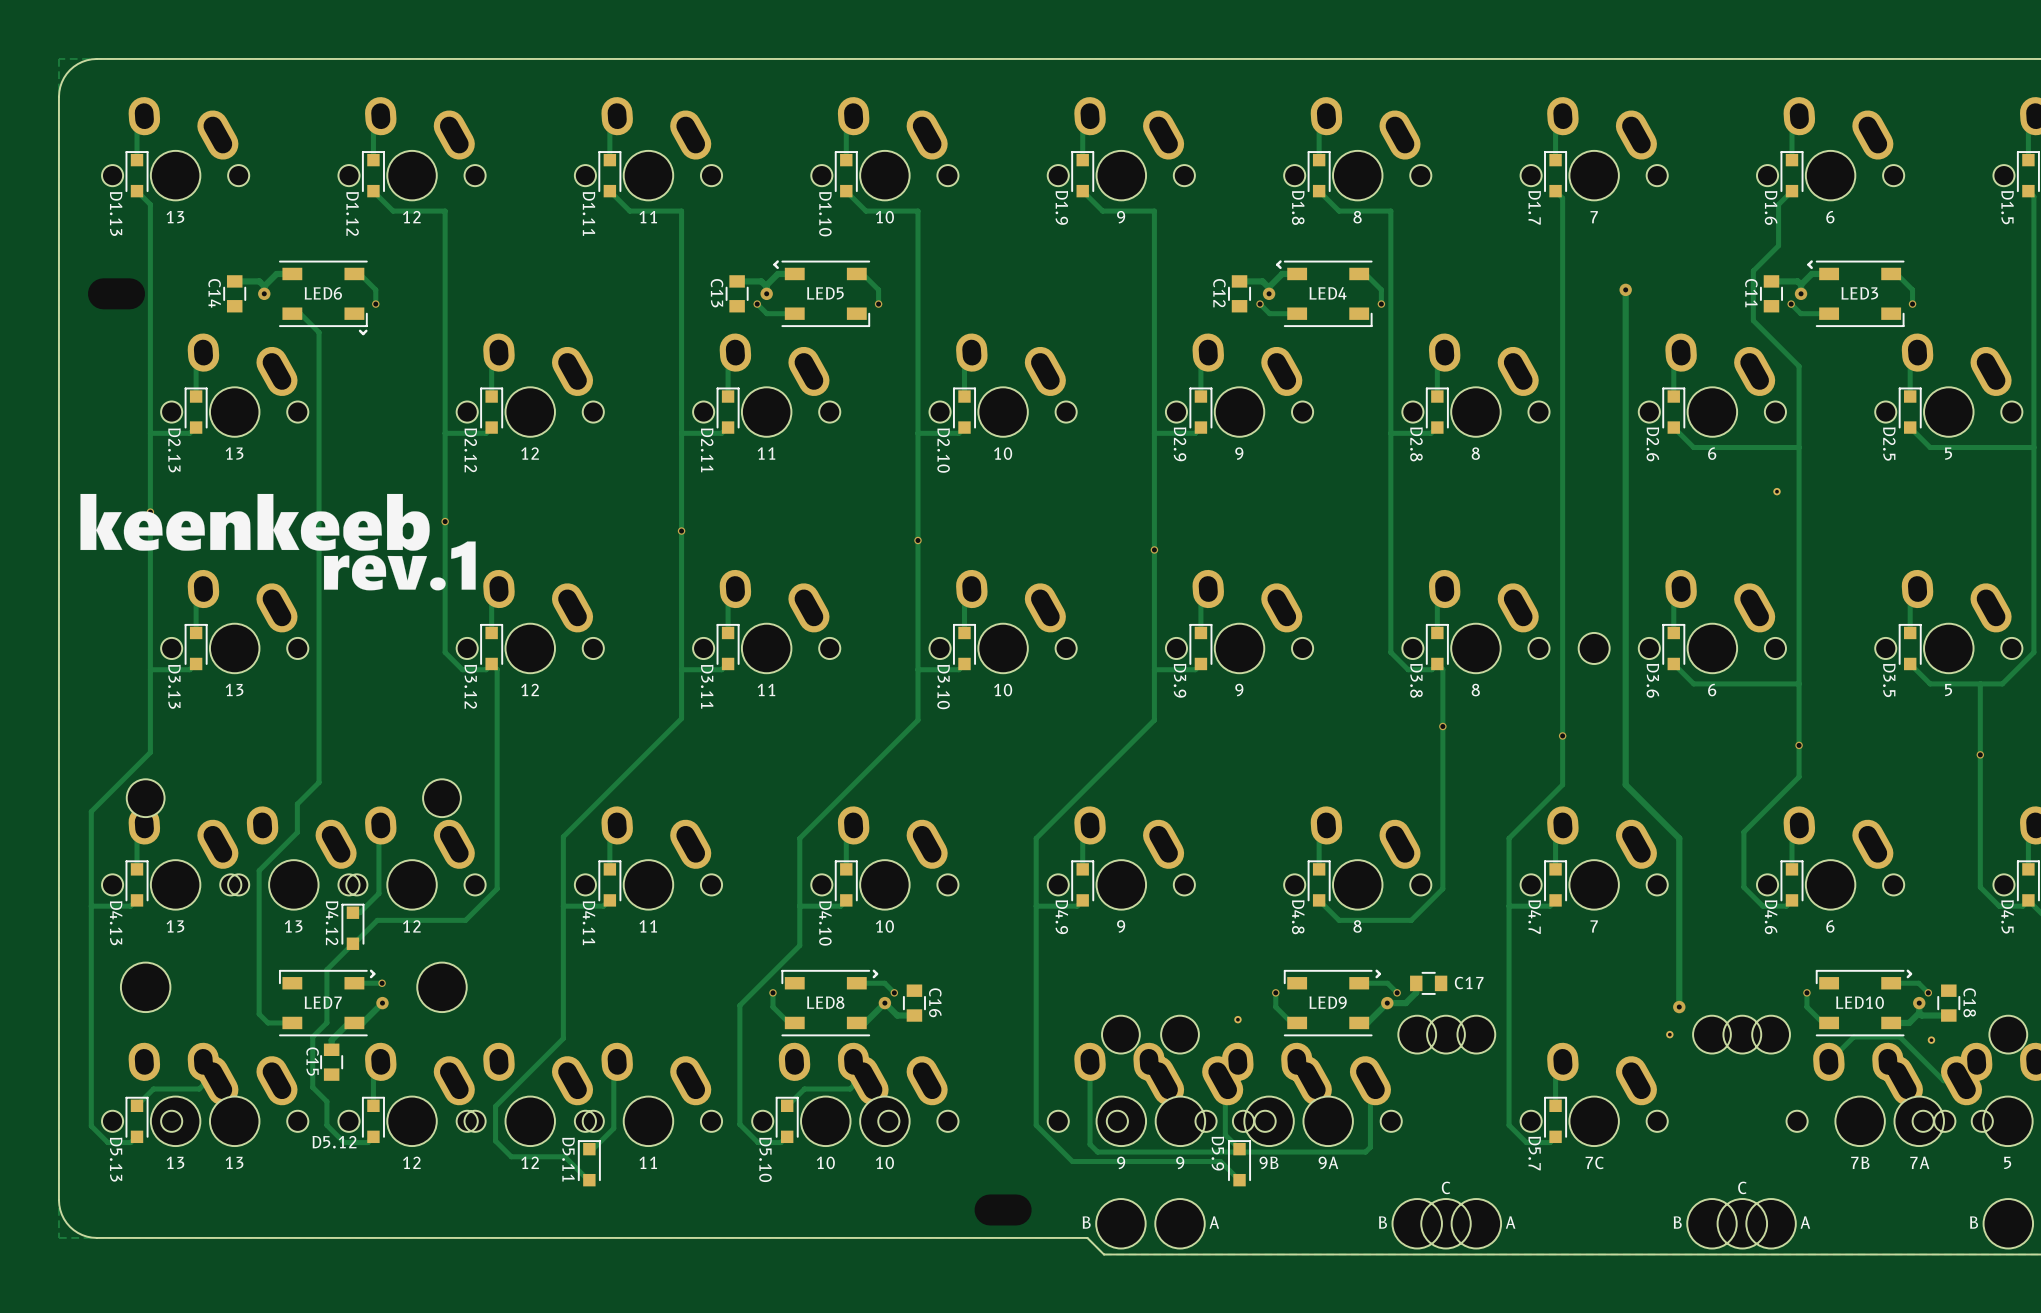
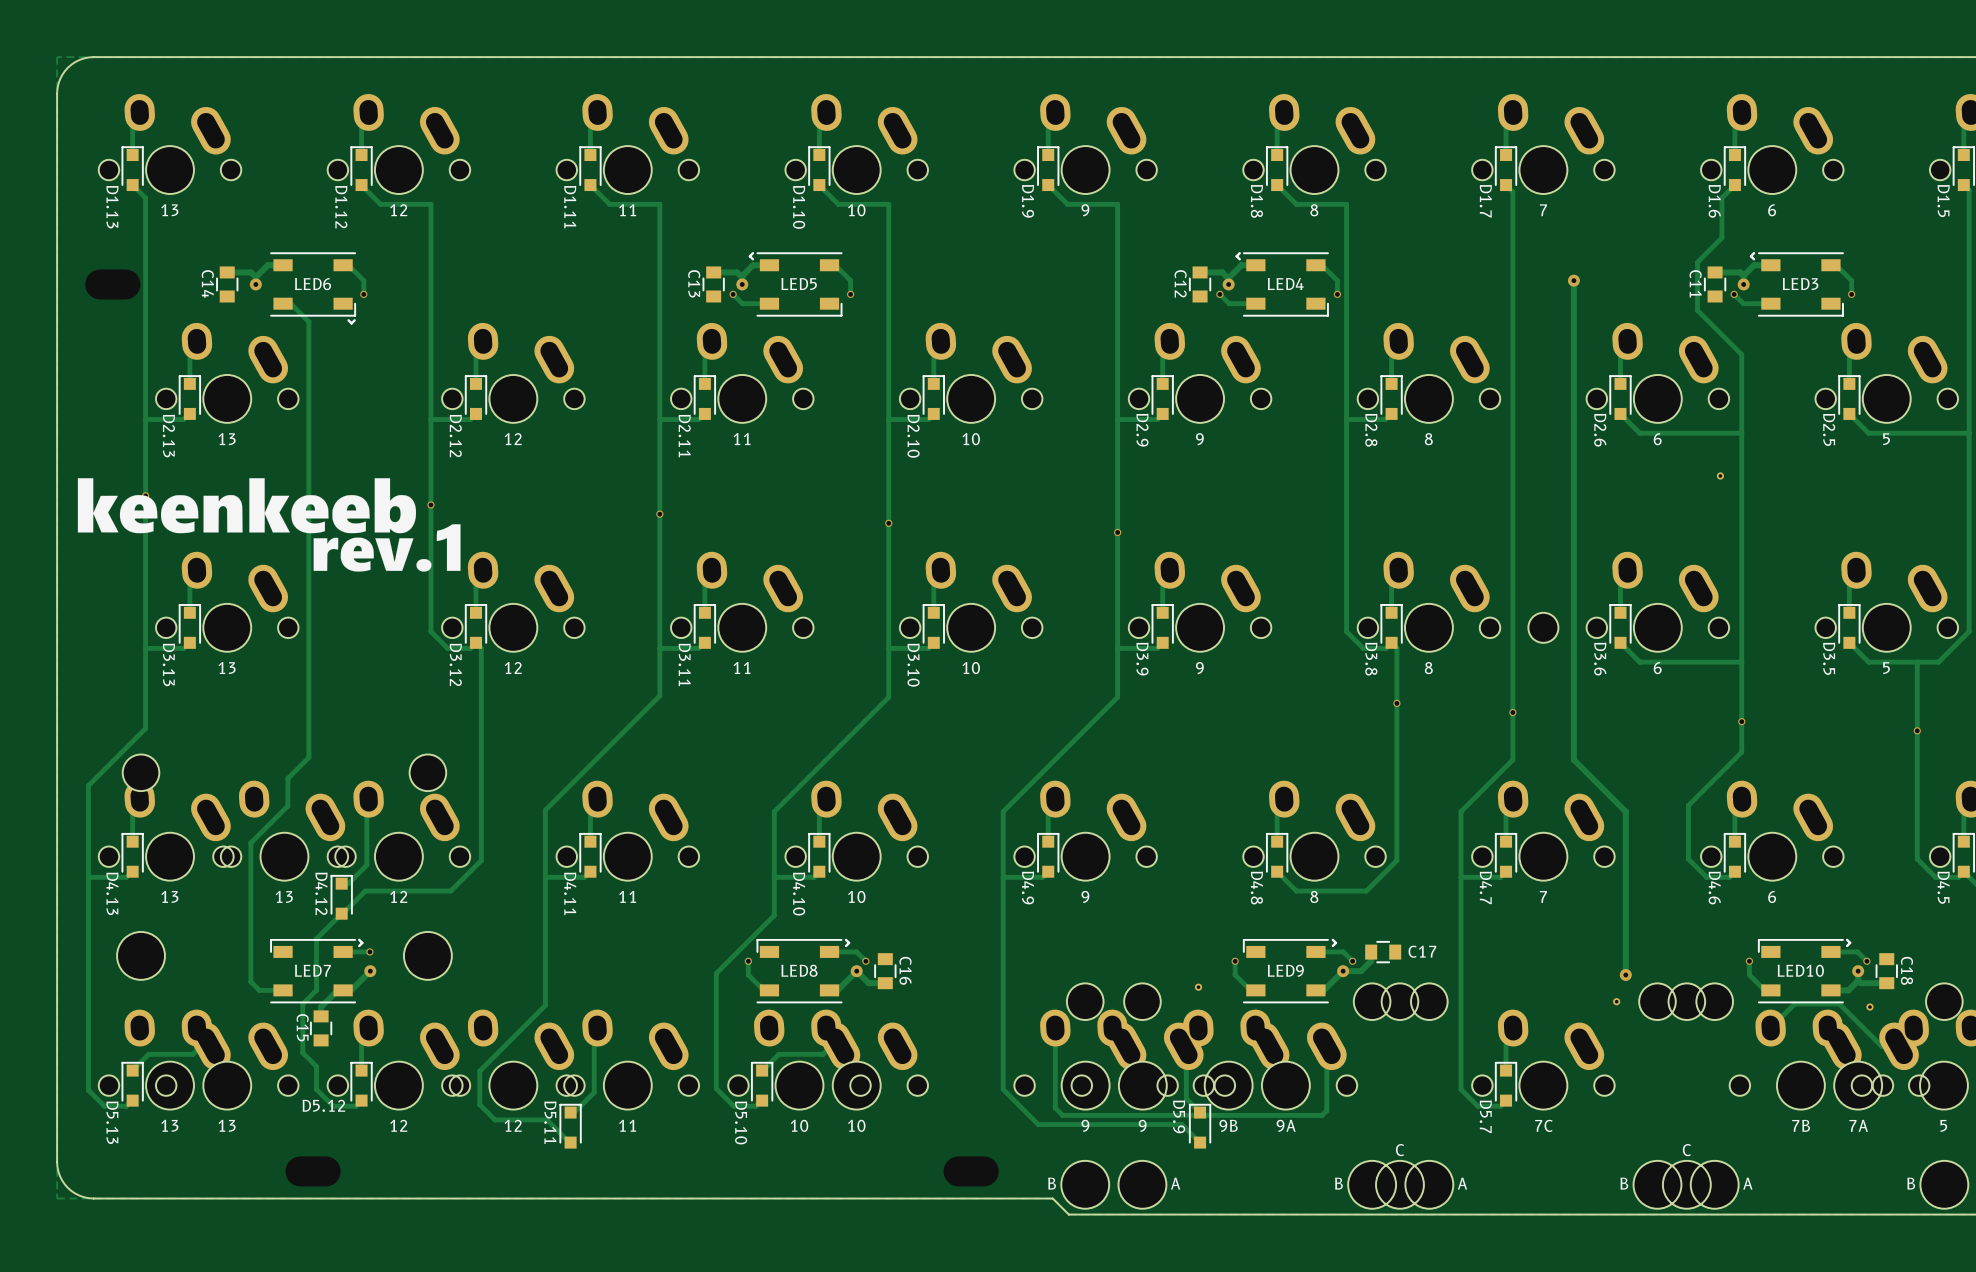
part: none -> (313, 1171)

